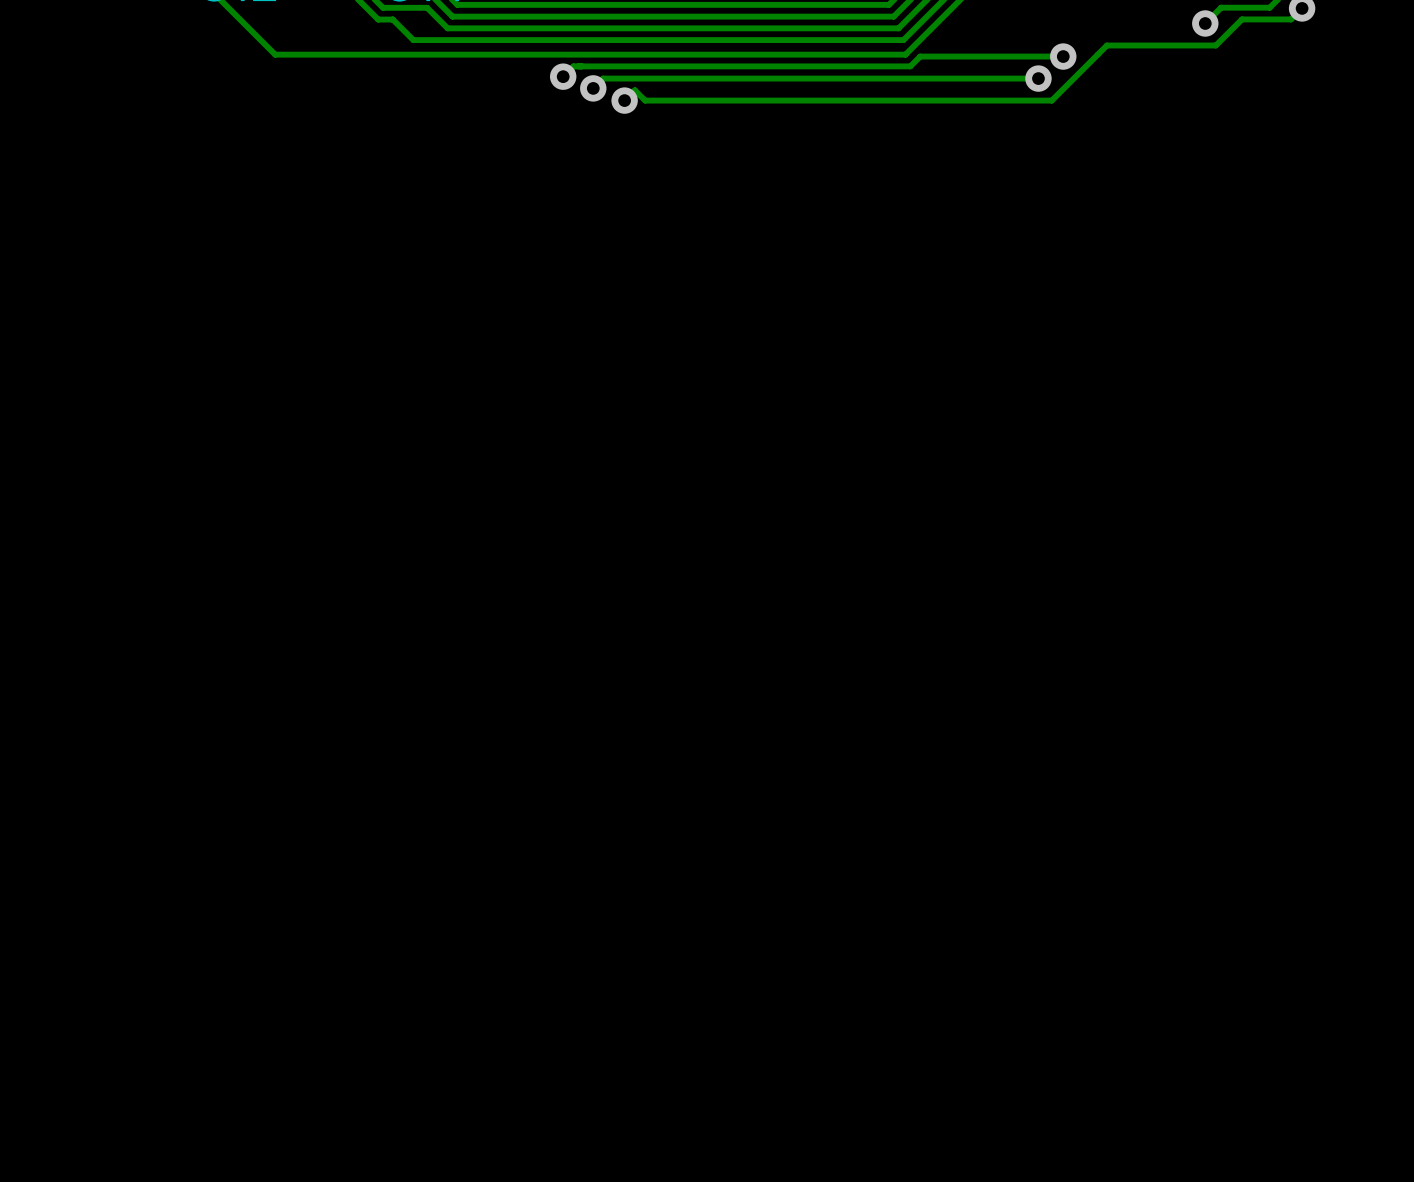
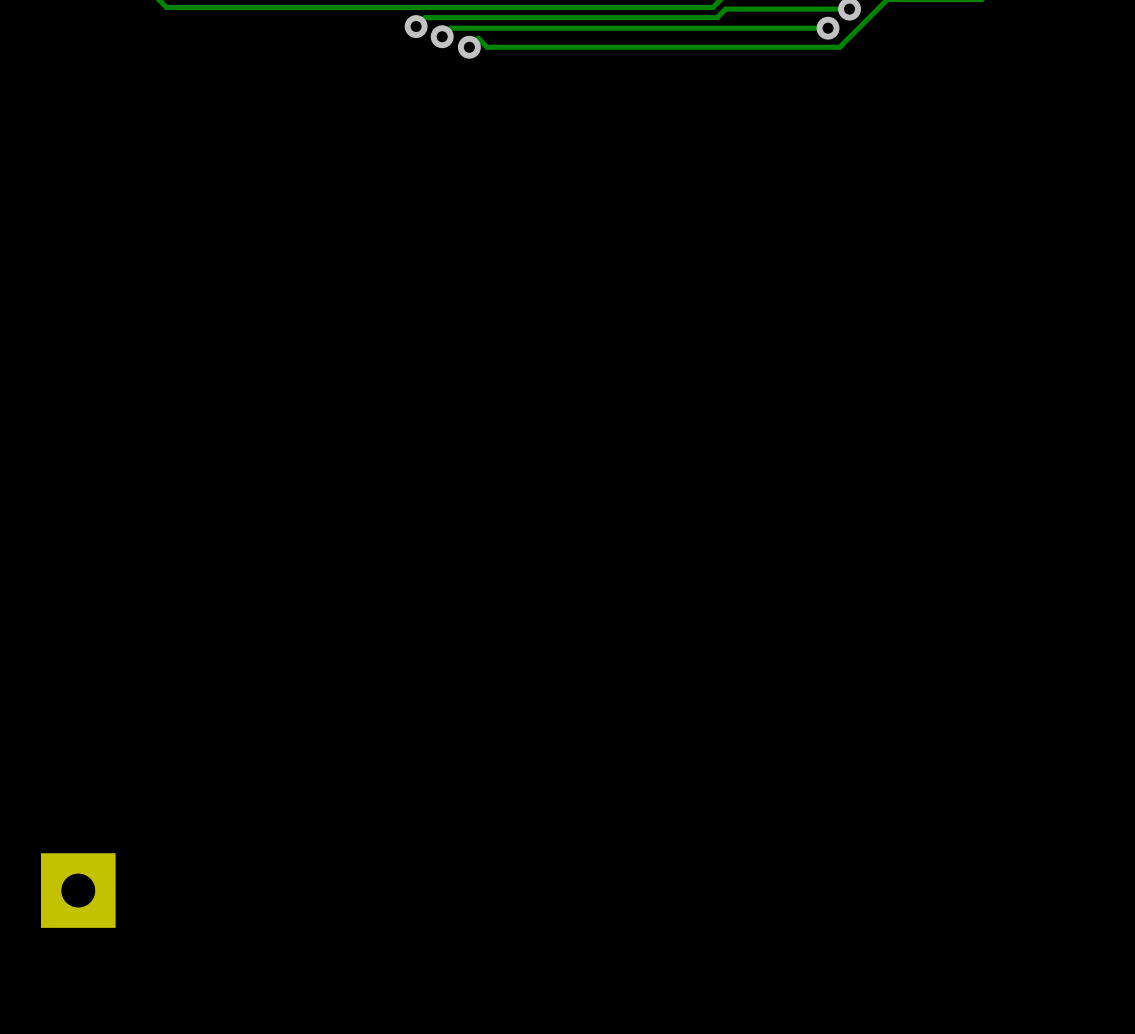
part: none -> (78, 890)

